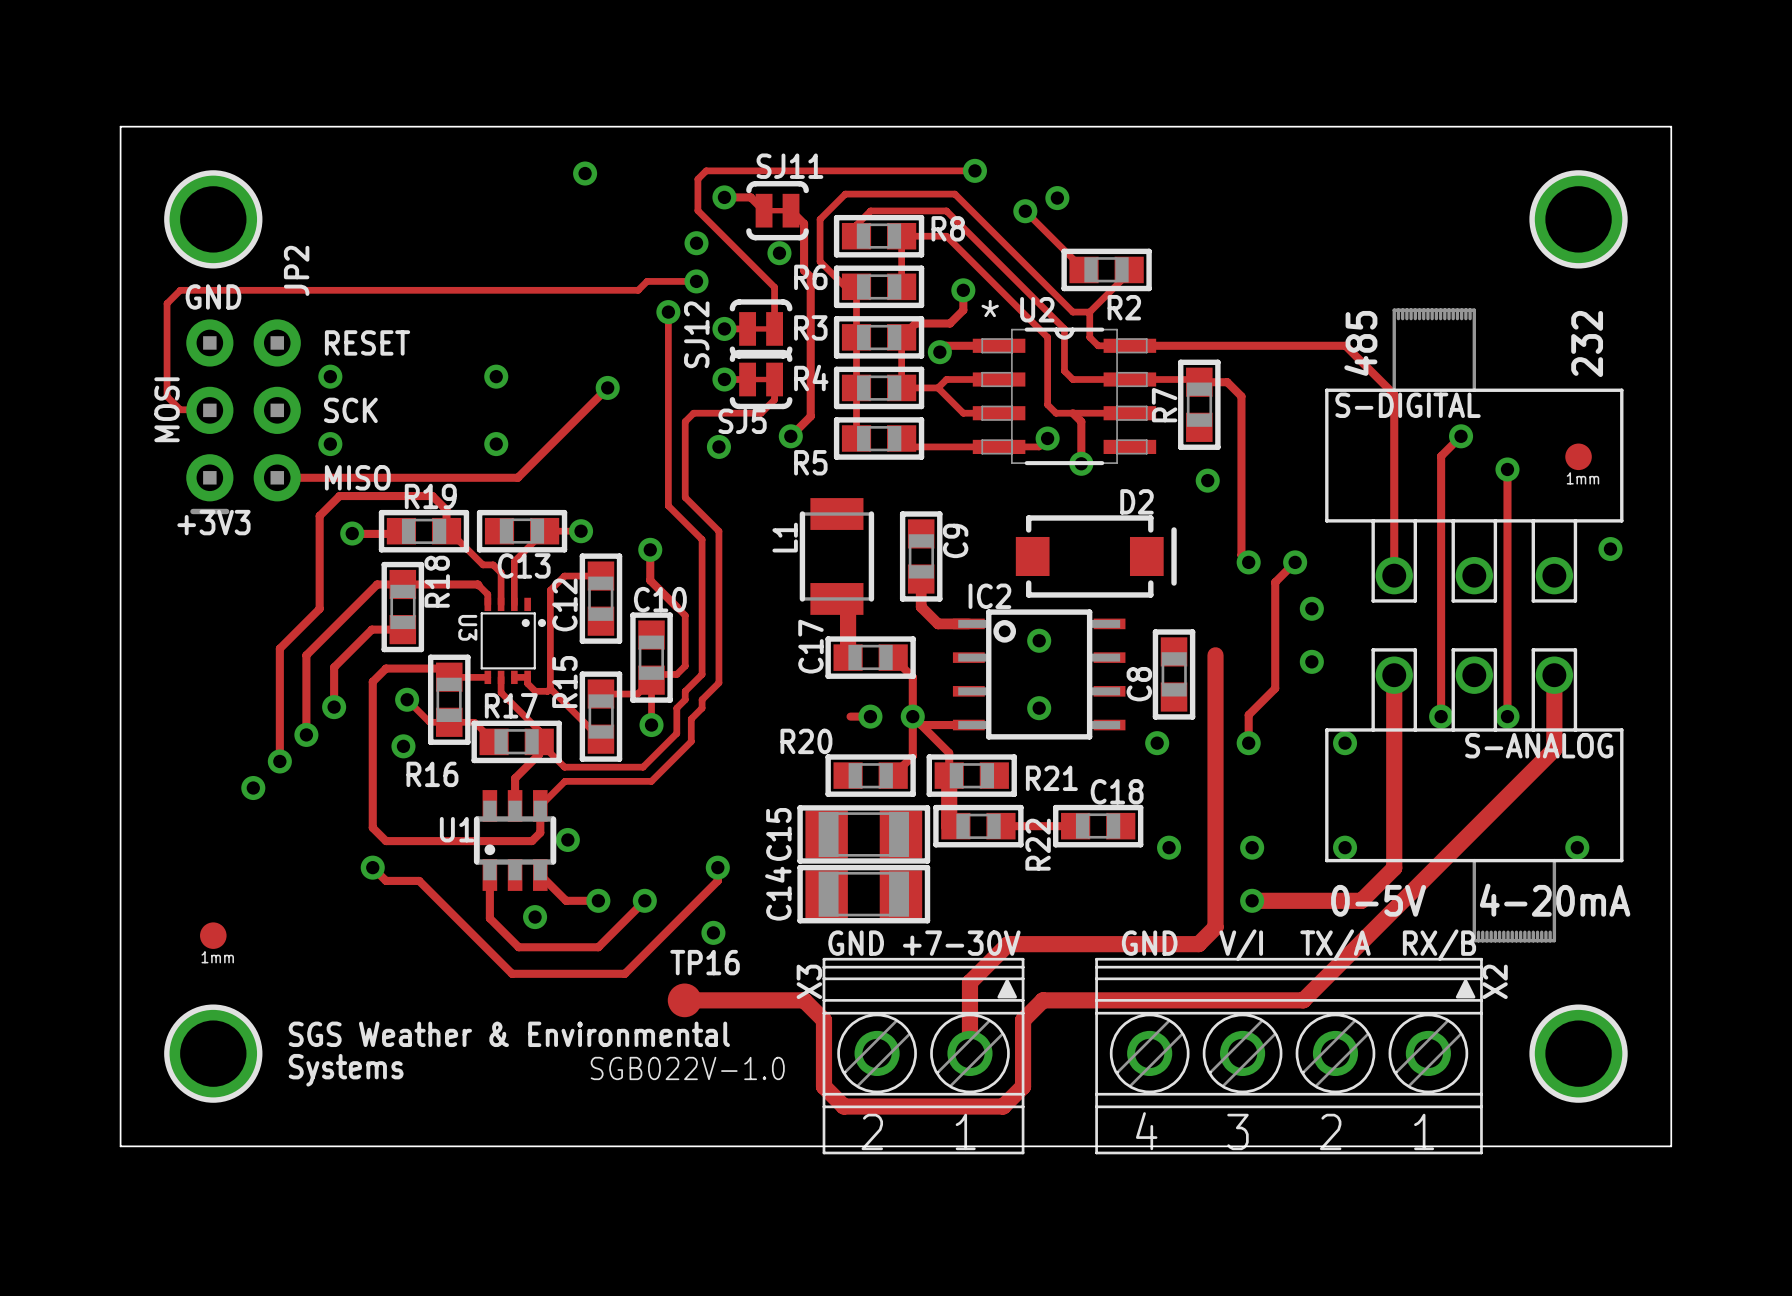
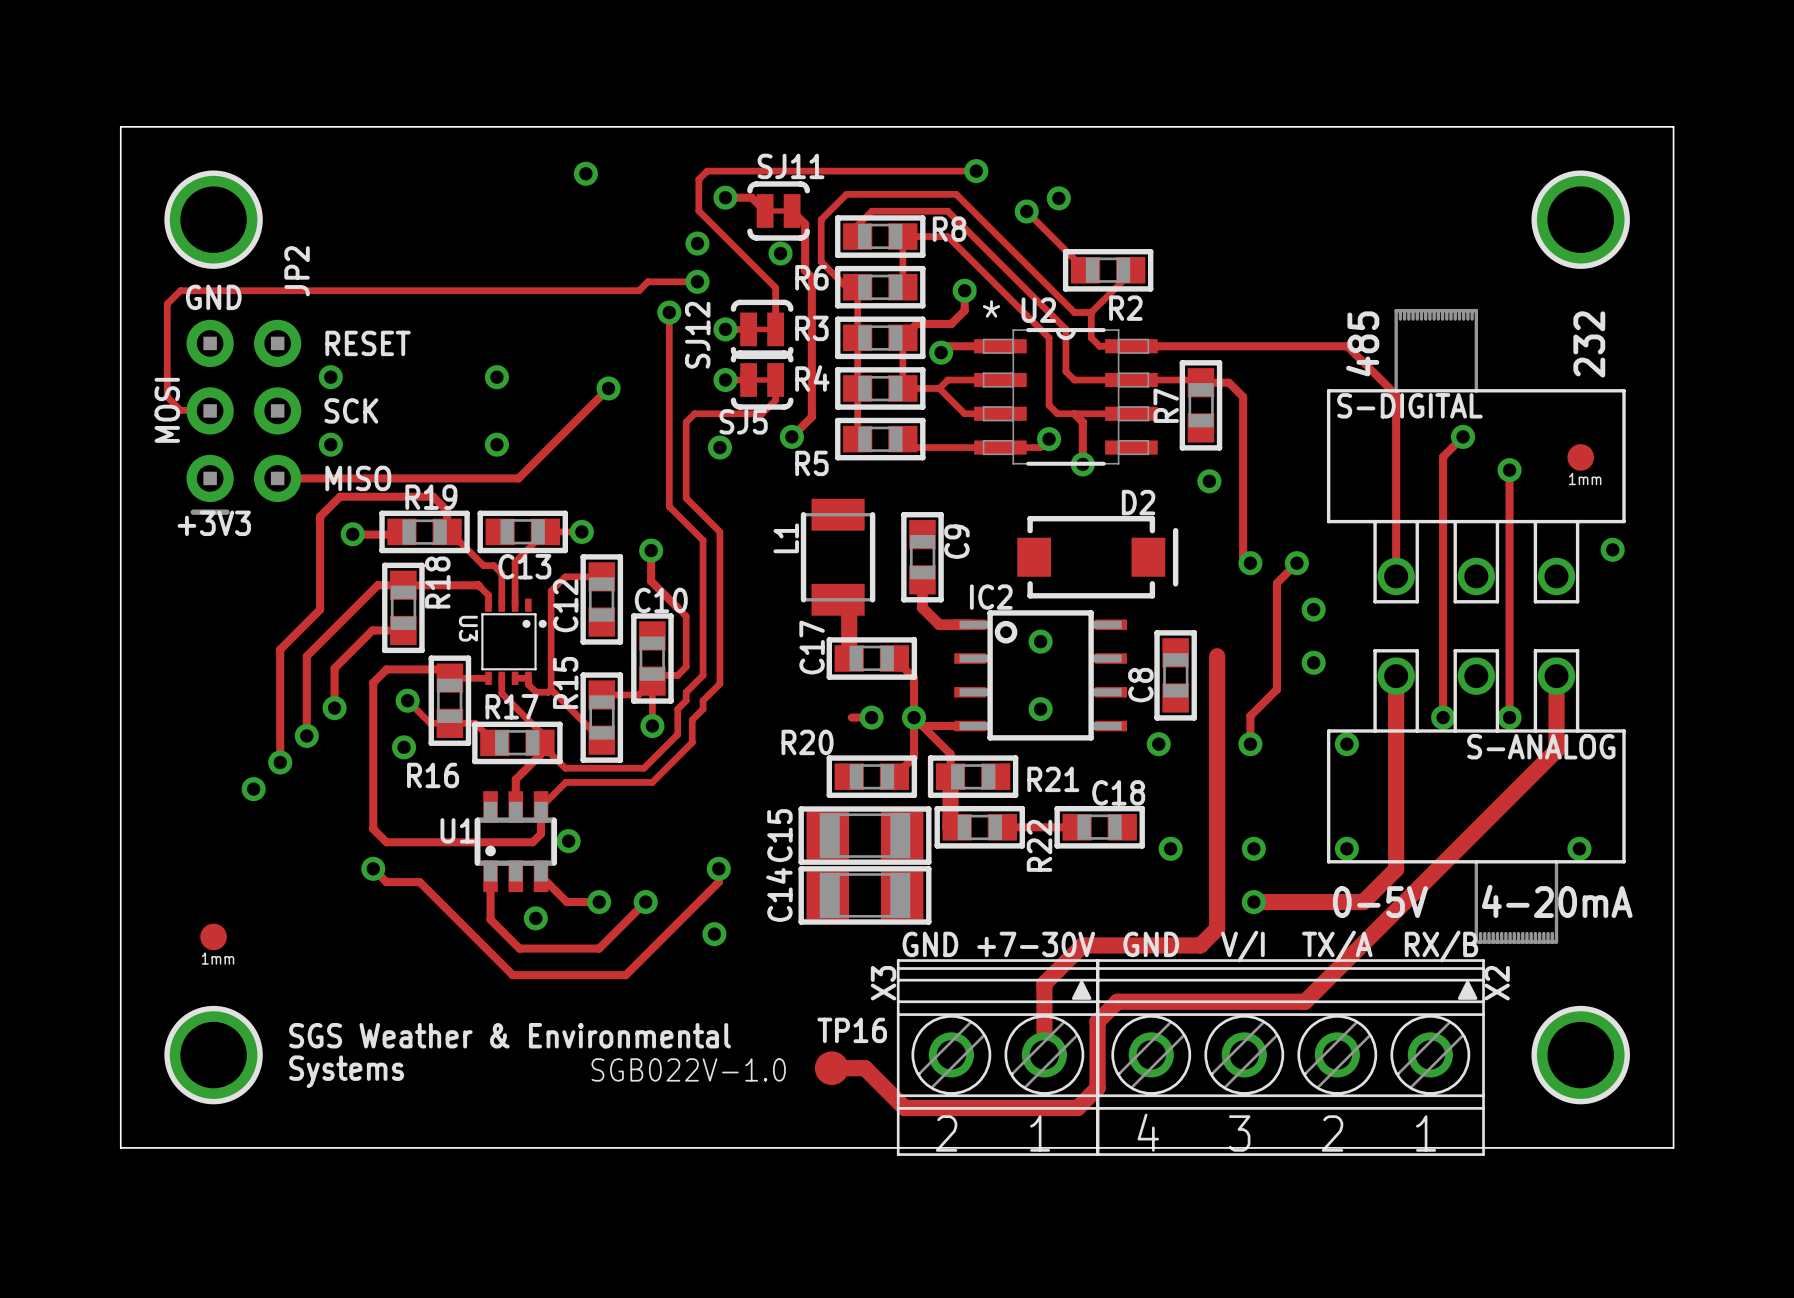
text position: GND (856, 943) -> GND (930, 944)
text position: +7-30V (961, 943) -> +7-30V (1036, 944)
track: (1081, 944) (1008, 944) (969, 982) (969, 1053) -> (1082, 945) (1044, 983) (1044, 1054)
track: (684, 1000) (804, 1000) (823, 1020) (823, 1086) (843, 1106) (903, 1106) -> (831, 1068) (864, 1068) (904, 1108)
TP16 position: (684, 1000) -> (831, 1068)
track: (1115, 1000) (1042, 1000) (1023, 1020) (1023, 1086) (1003, 1106) -> (1117, 1001) (1097, 1021) (1097, 1088) (1077, 1108) (1004, 1108)
X3 position: (923, 1056) -> (997, 1057)

